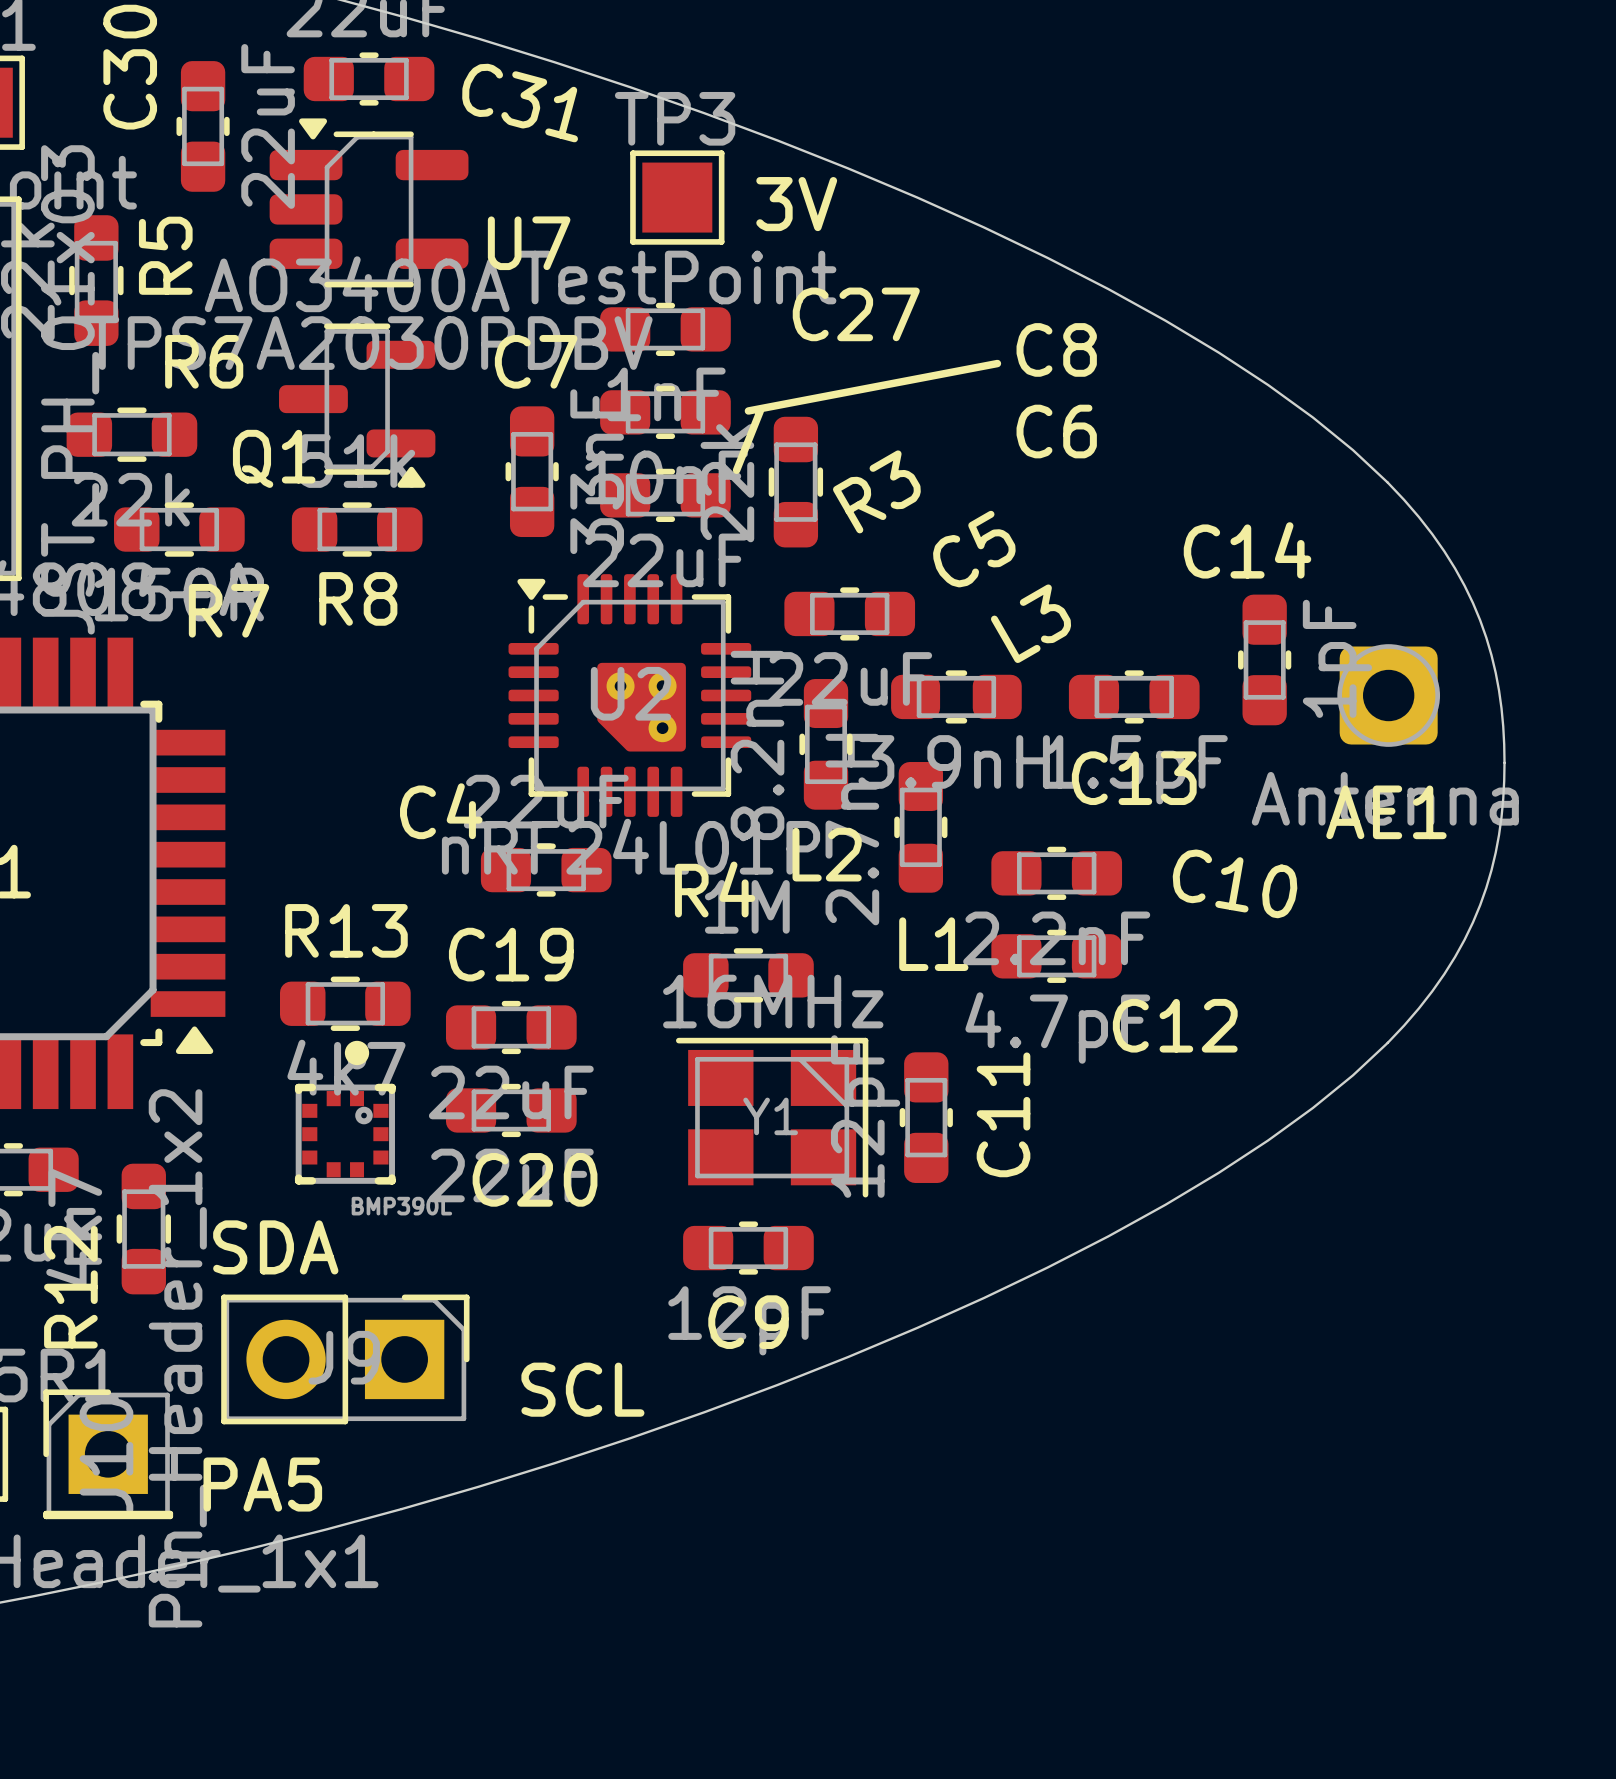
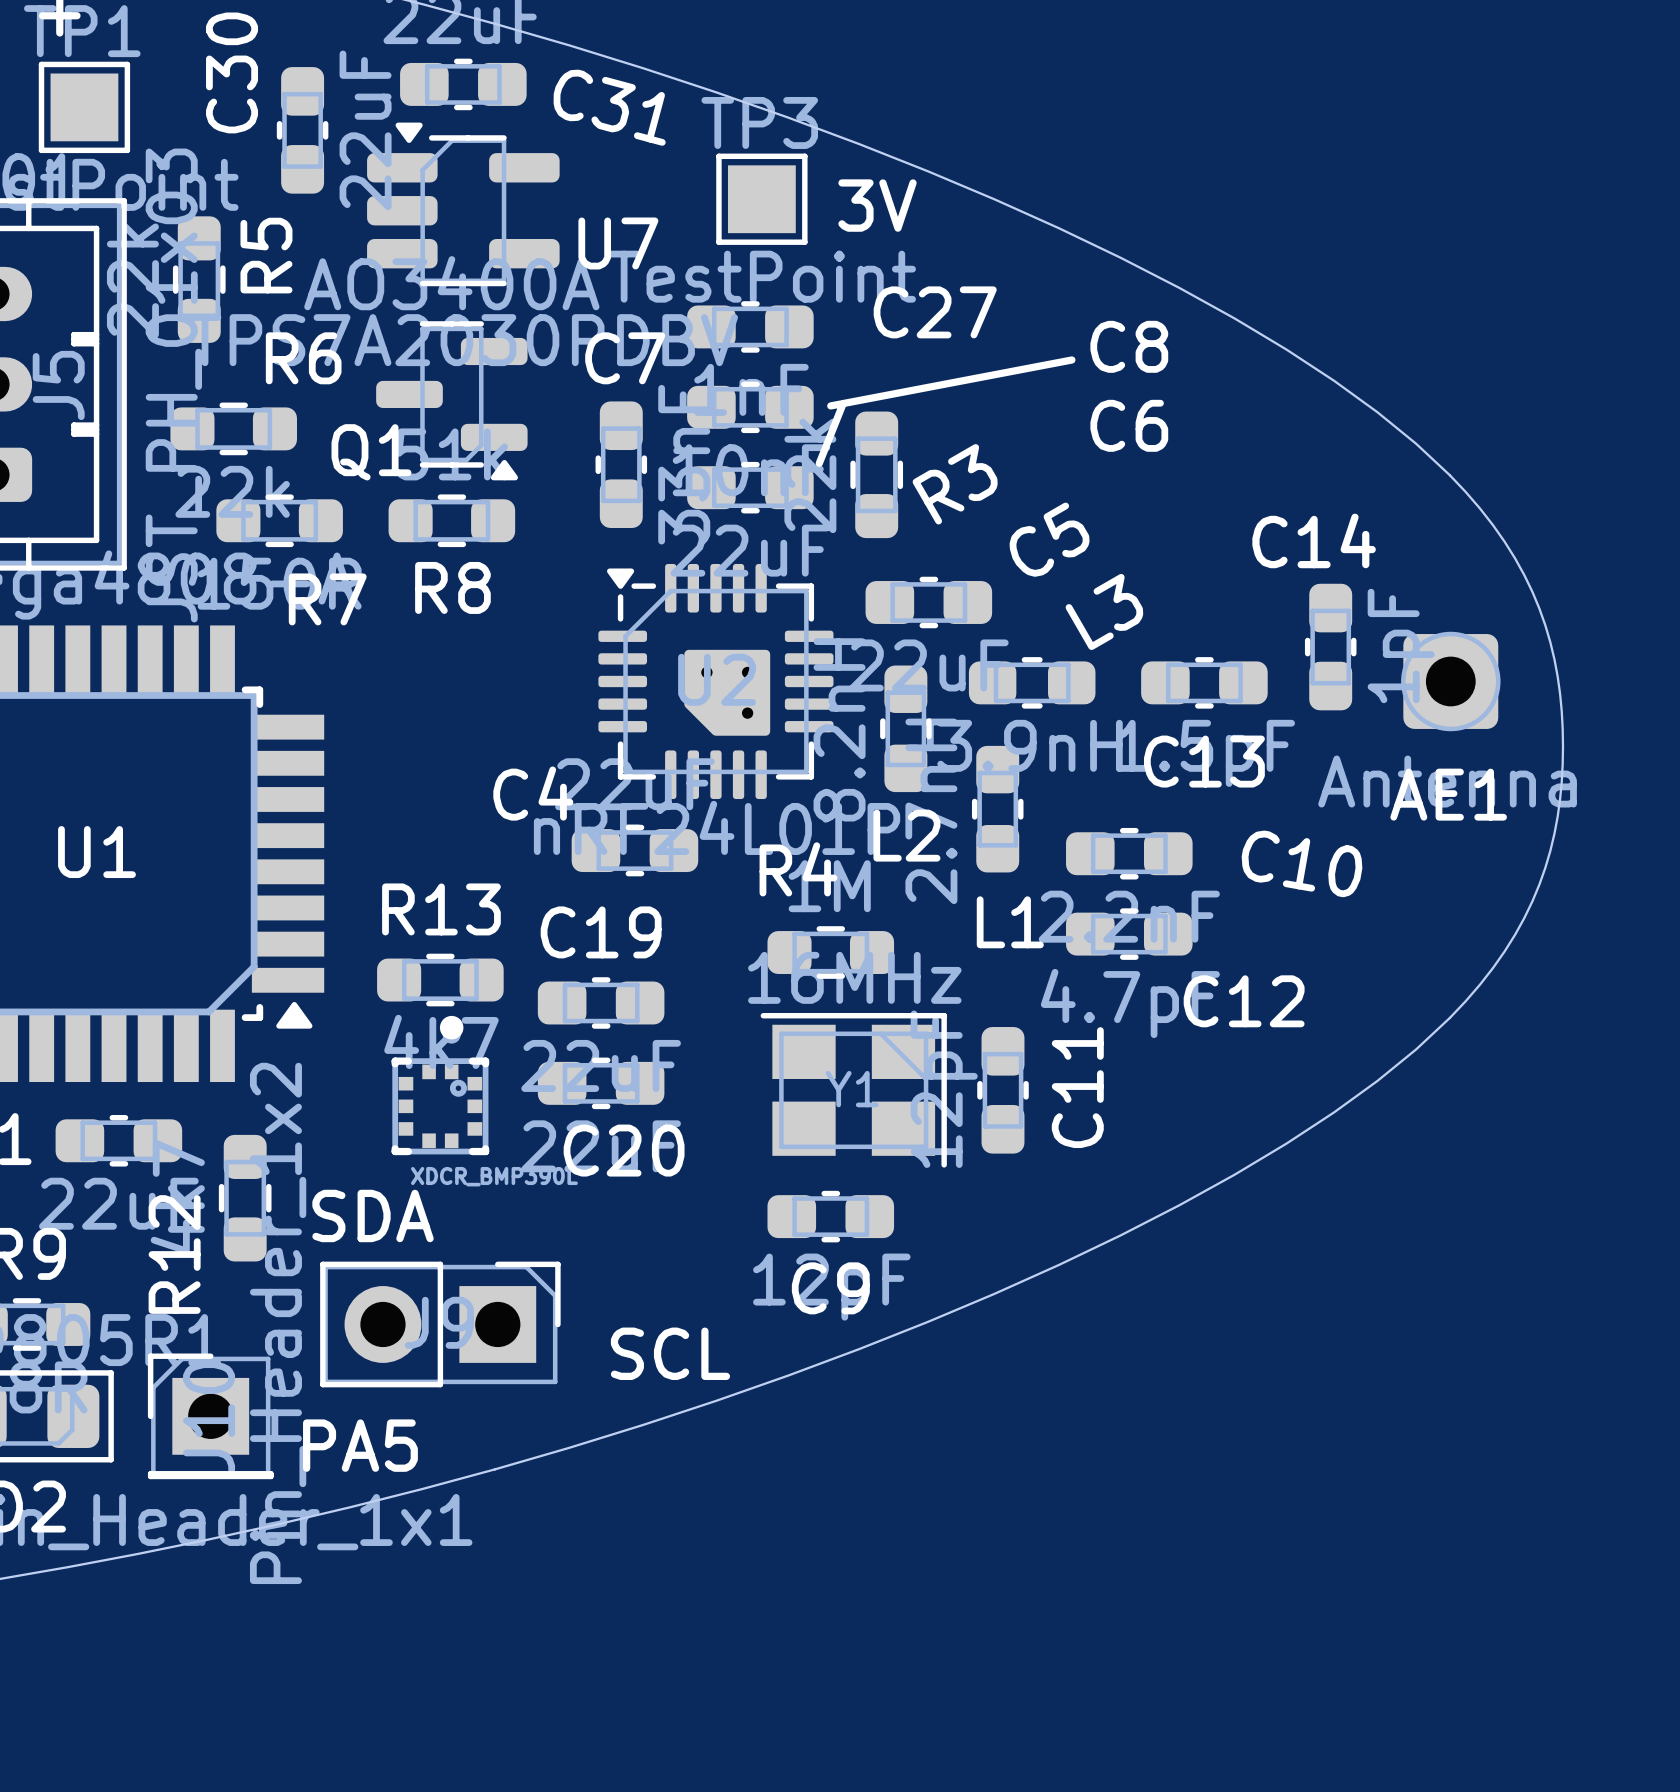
part value: BMP390L (401, 1206) -> XDCR_BMP390L (494, 1176)

